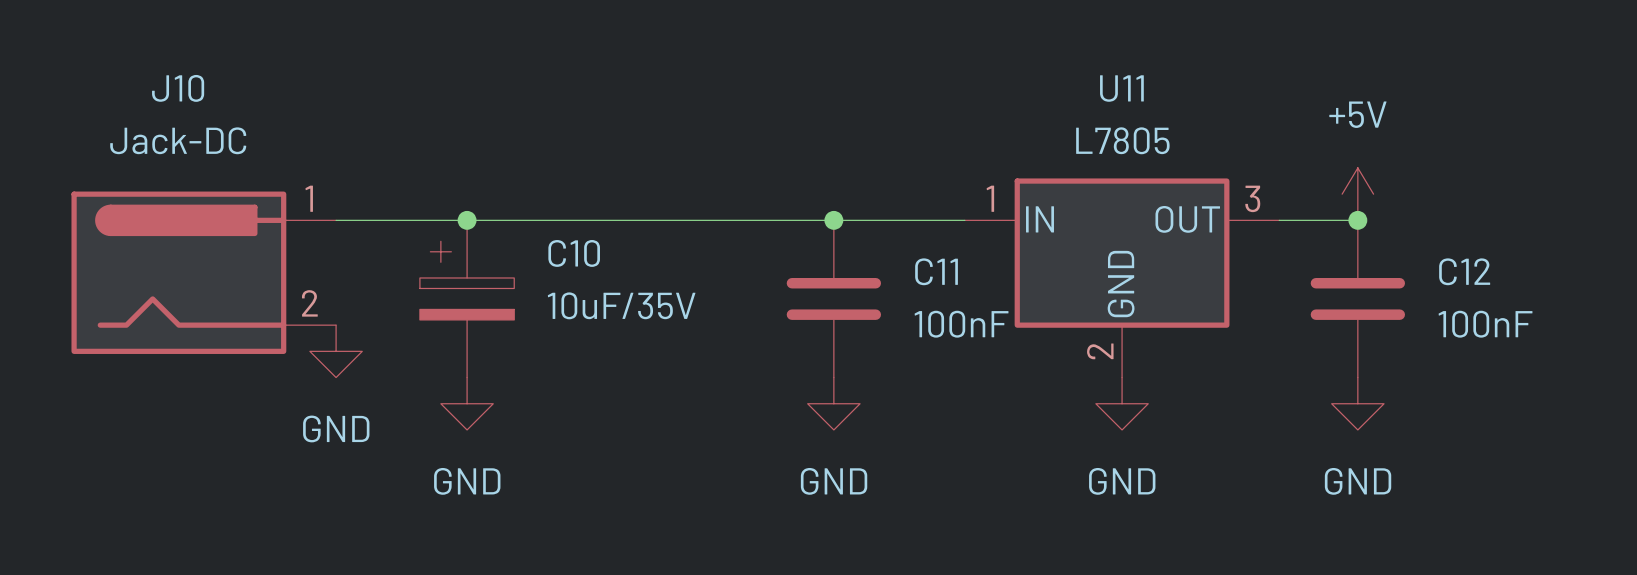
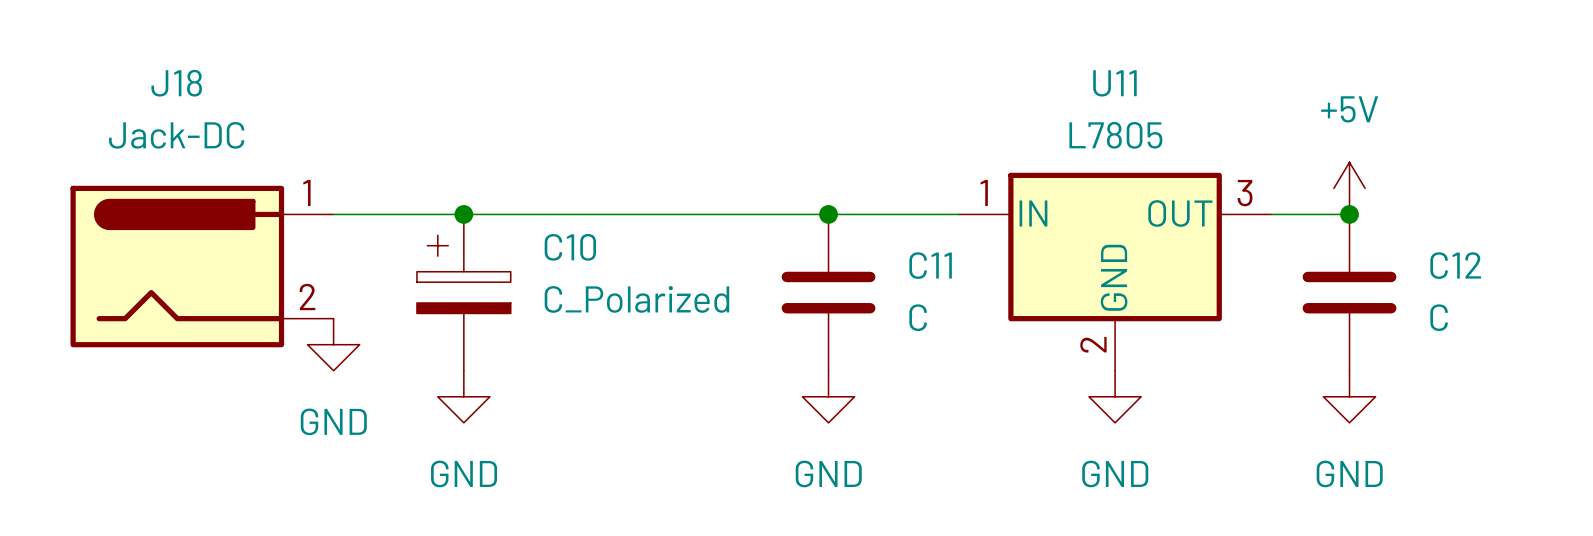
J10 name: J10 (178, 88) -> J18 (176, 83)
C10 value: 10uF/35V (621, 305) -> C_Polarized (636, 299)
C11 value: 100nF (961, 324) -> C (918, 317)
C12 value: 100nF (1485, 324) -> C (1439, 317)

